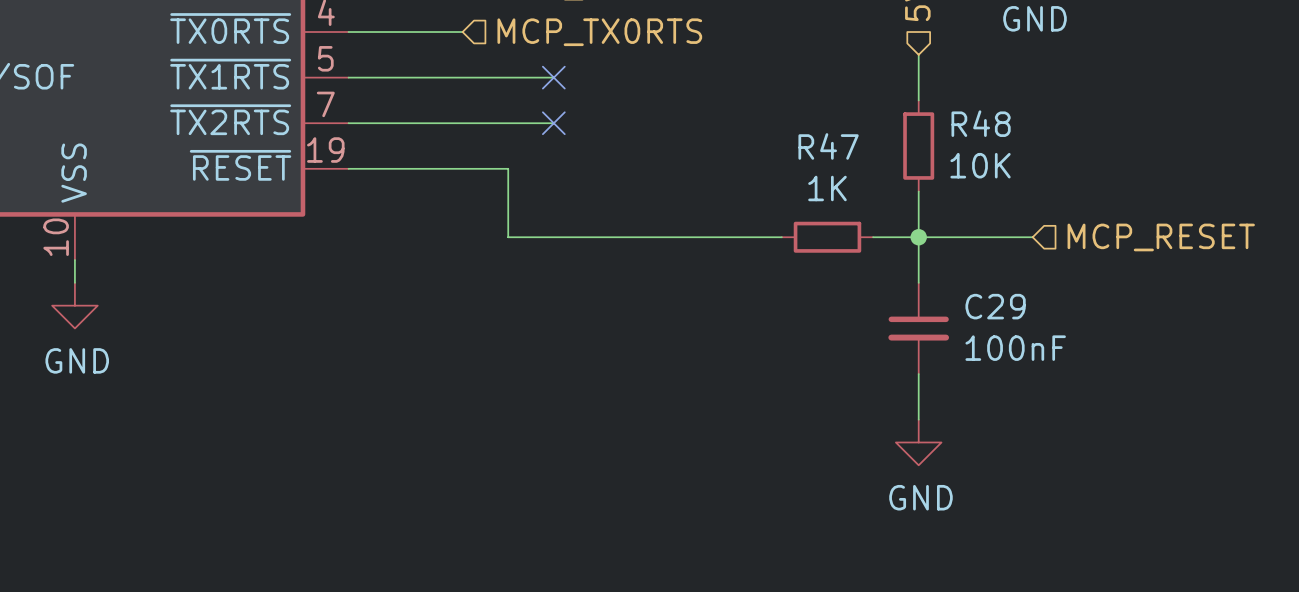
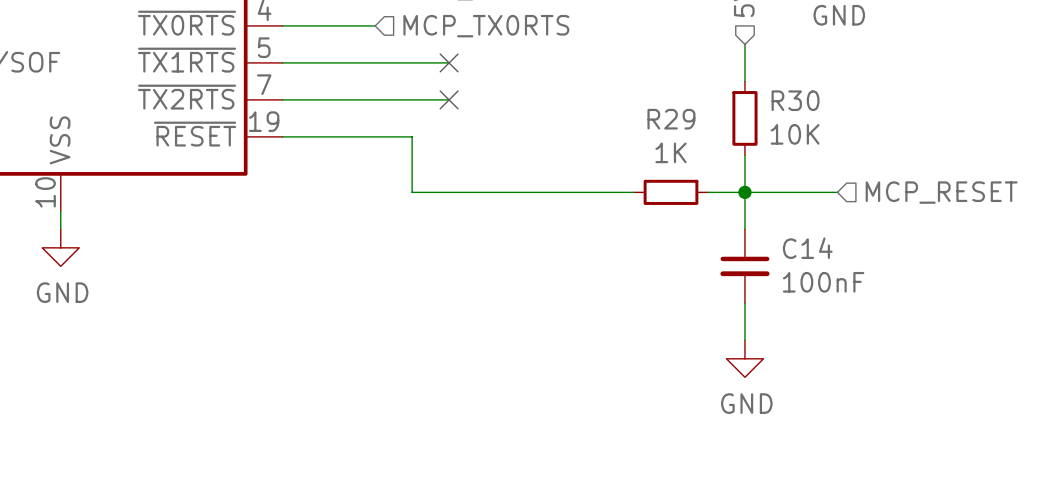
R48 name: R48 (981, 123) -> R30 (795, 100)
R47 name: R47 (828, 146) -> R29 (671, 119)
C29 name: C29 (995, 306) -> C14 (807, 248)

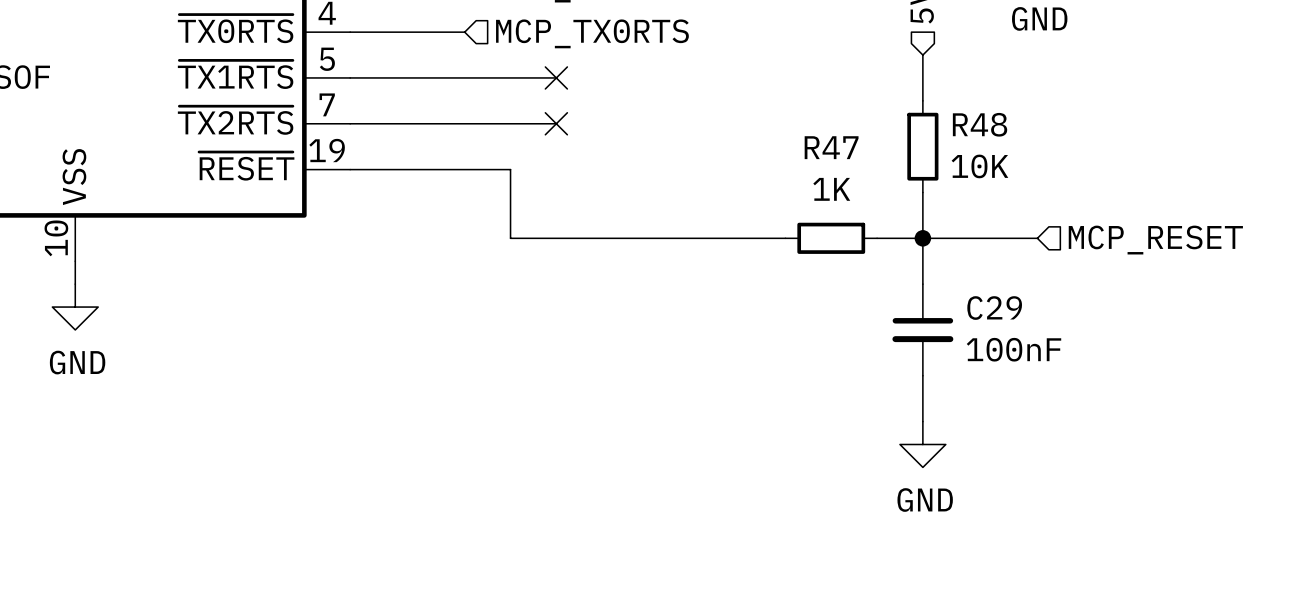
R30 name: R30 (795, 100) -> R48 (980, 124)
R29 name: R29 (671, 119) -> R47 (831, 147)
C14 name: C14 (807, 248) -> C29 (994, 308)

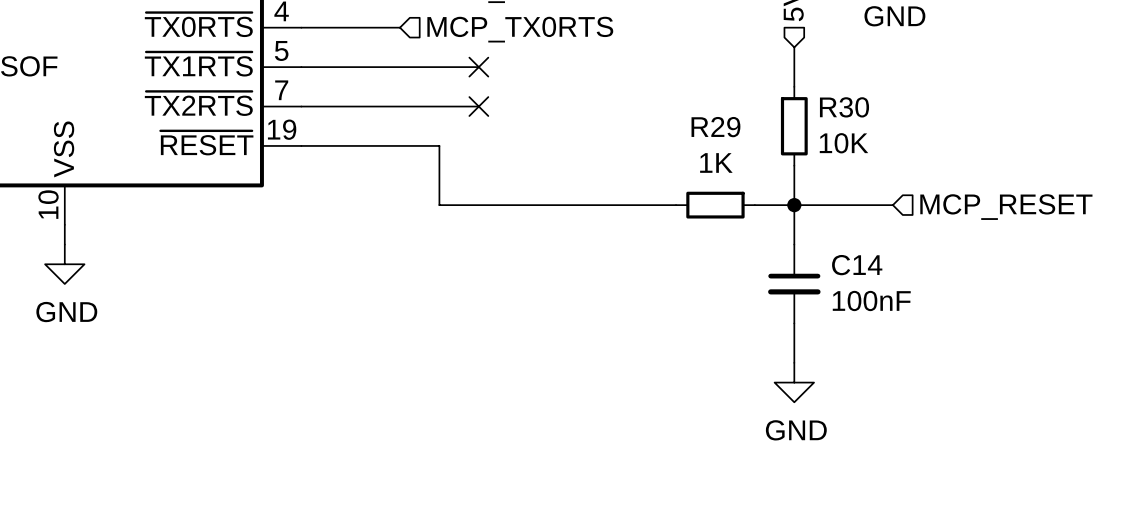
R48 name: R48 (980, 124) -> R30 (844, 107)
R47 name: R47 (831, 147) -> R29 (715, 127)
C29 name: C29 (994, 308) -> C14 (857, 265)

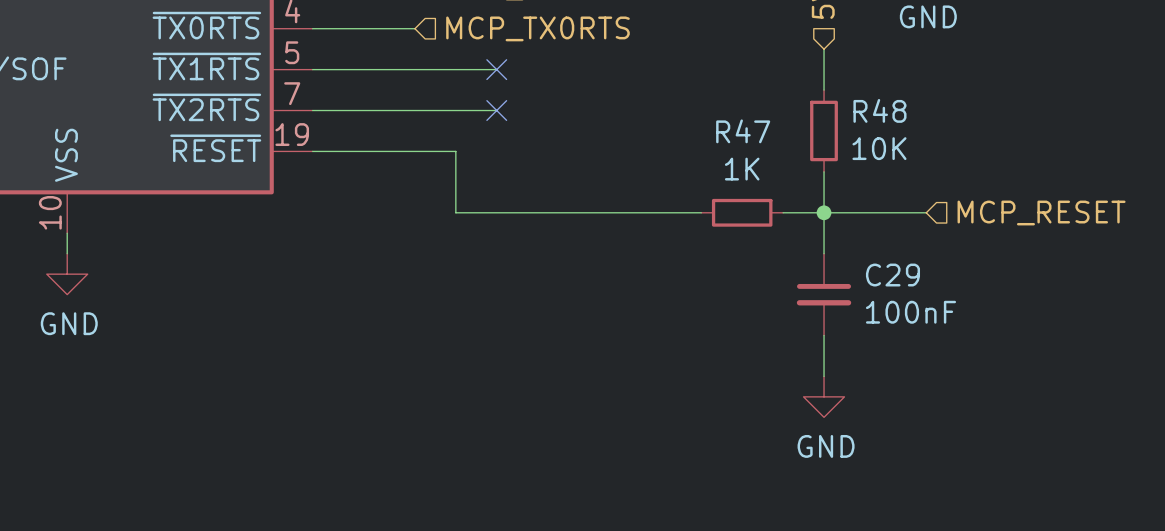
R30 name: R30 (844, 107) -> R48 (879, 110)
R29 name: R29 (715, 127) -> R47 (743, 131)
C14 name: C14 (857, 265) -> C29 (892, 275)

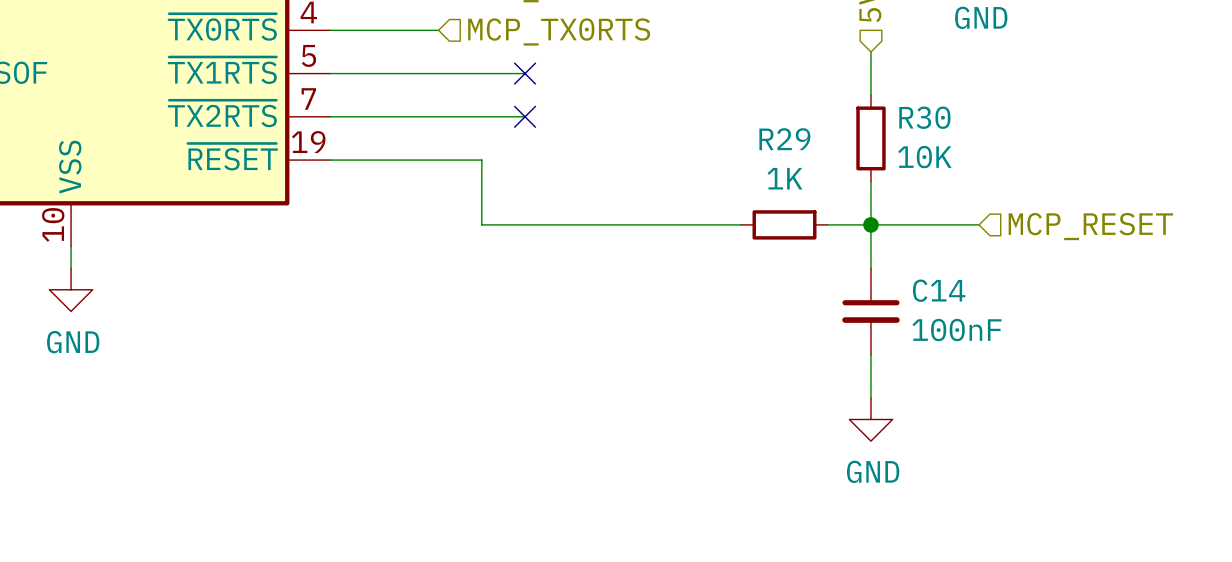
R48 name: R48 (879, 110) -> R30 (924, 117)
R47 name: R47 (743, 131) -> R29 (784, 139)
C29 name: C29 (892, 275) -> C14 (939, 290)

